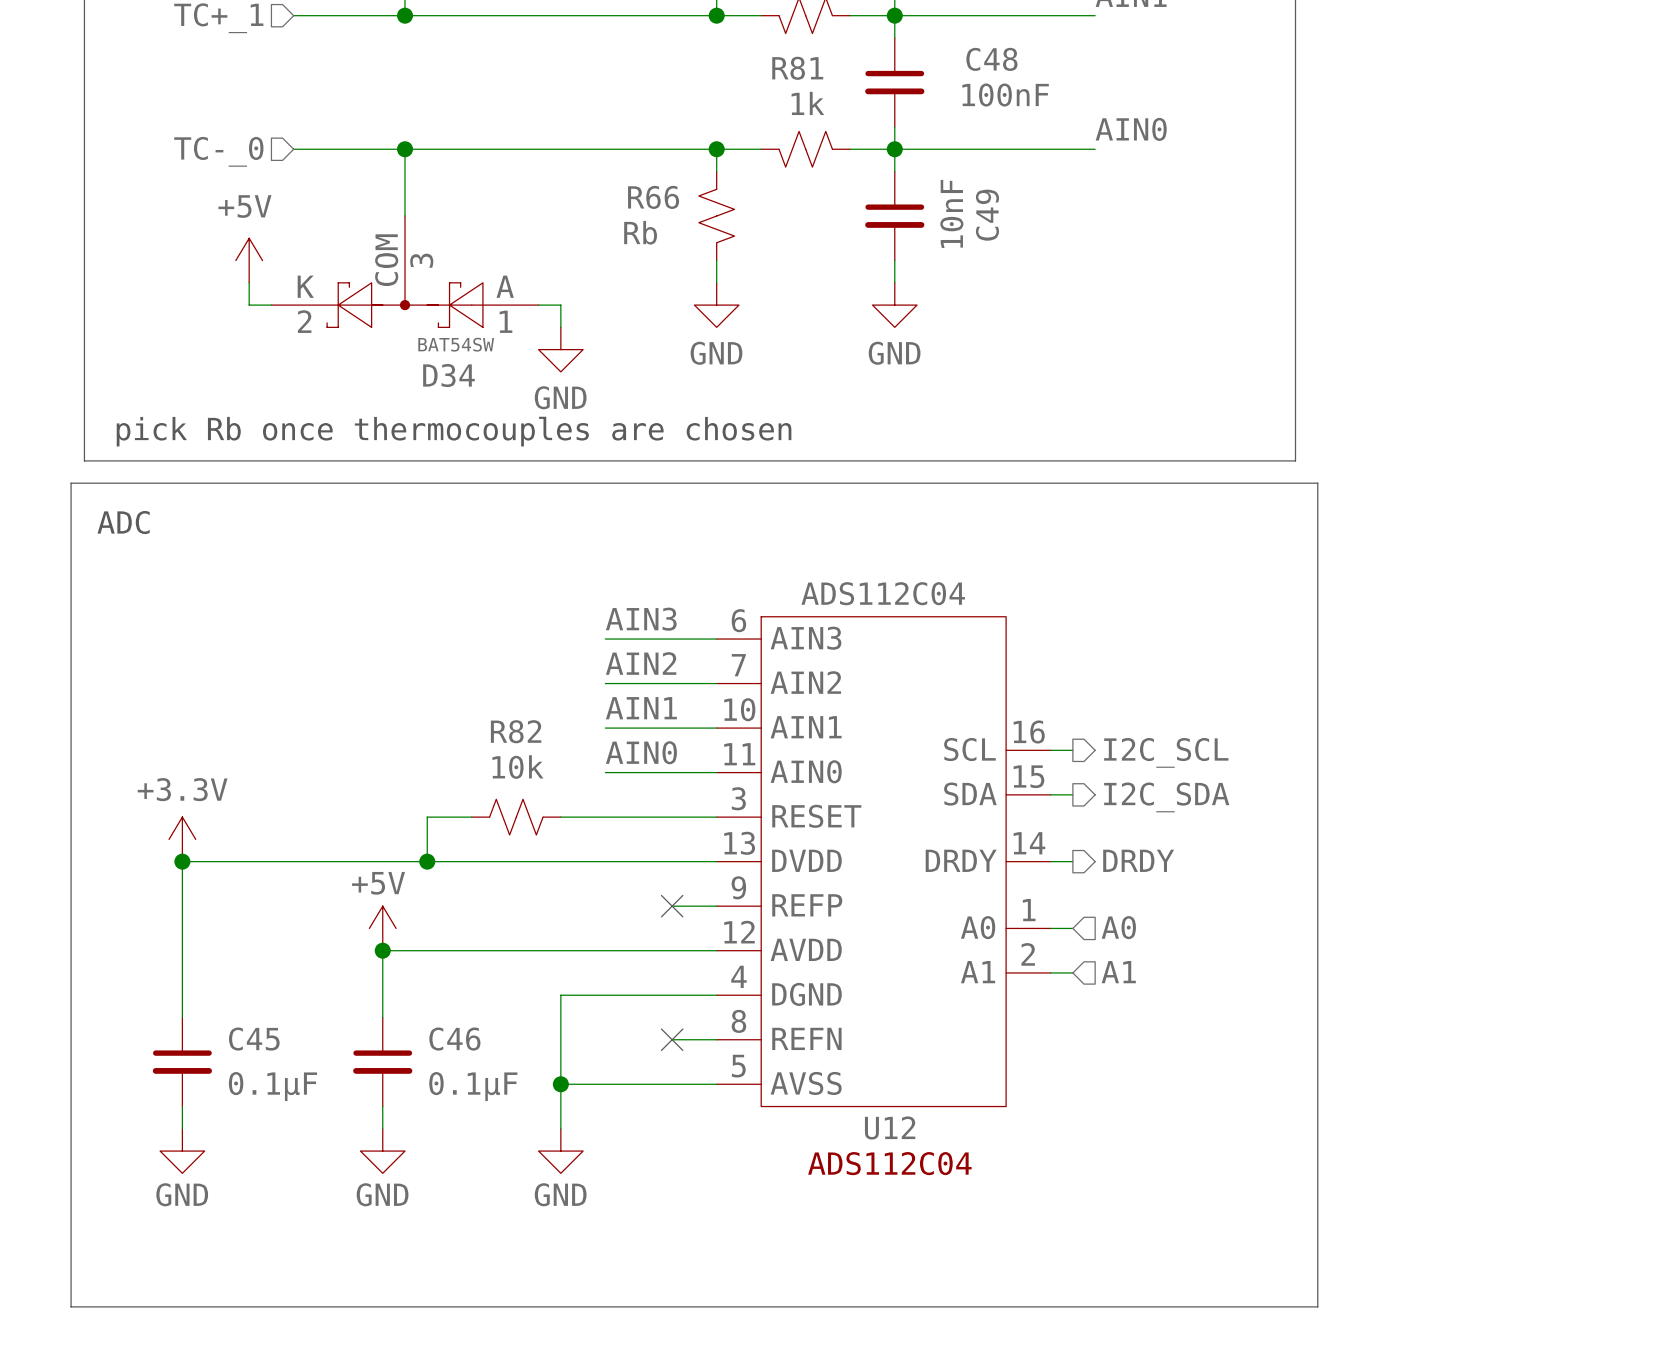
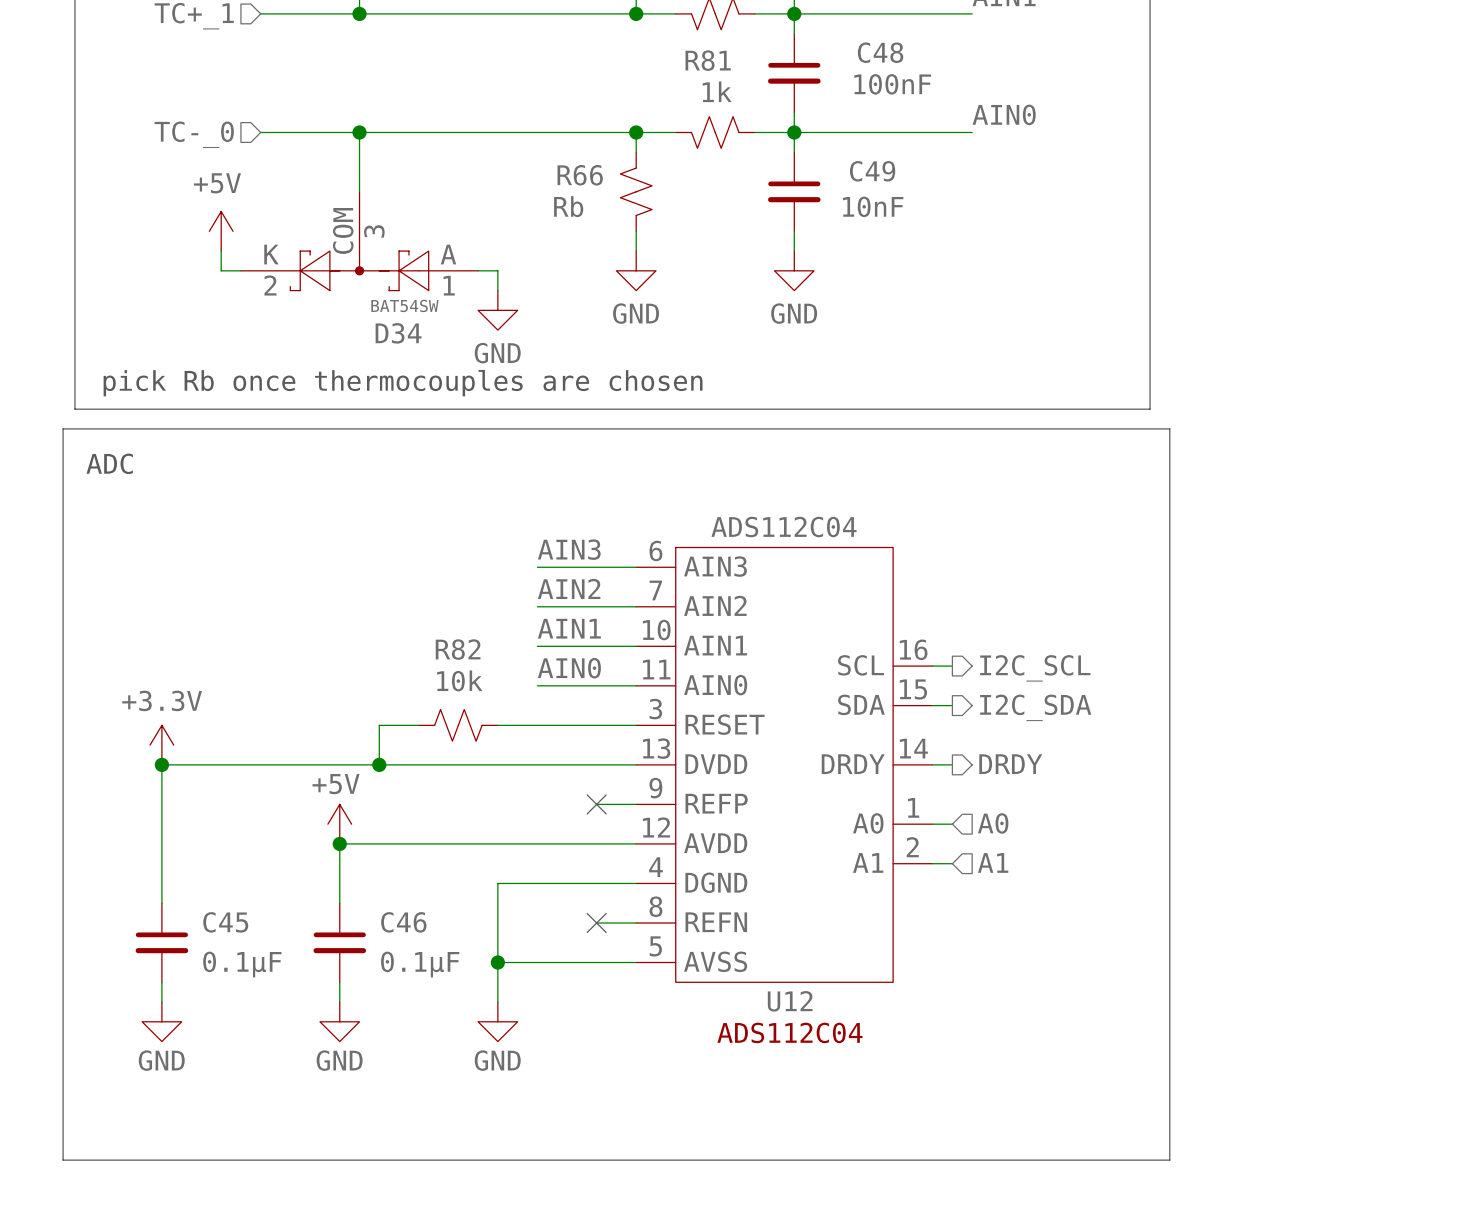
C49 value rotation: 0° (951, 213) -> 90° clockwise (873, 206)
C49 name rotation: 0° (987, 215) -> 90° clockwise (872, 171)

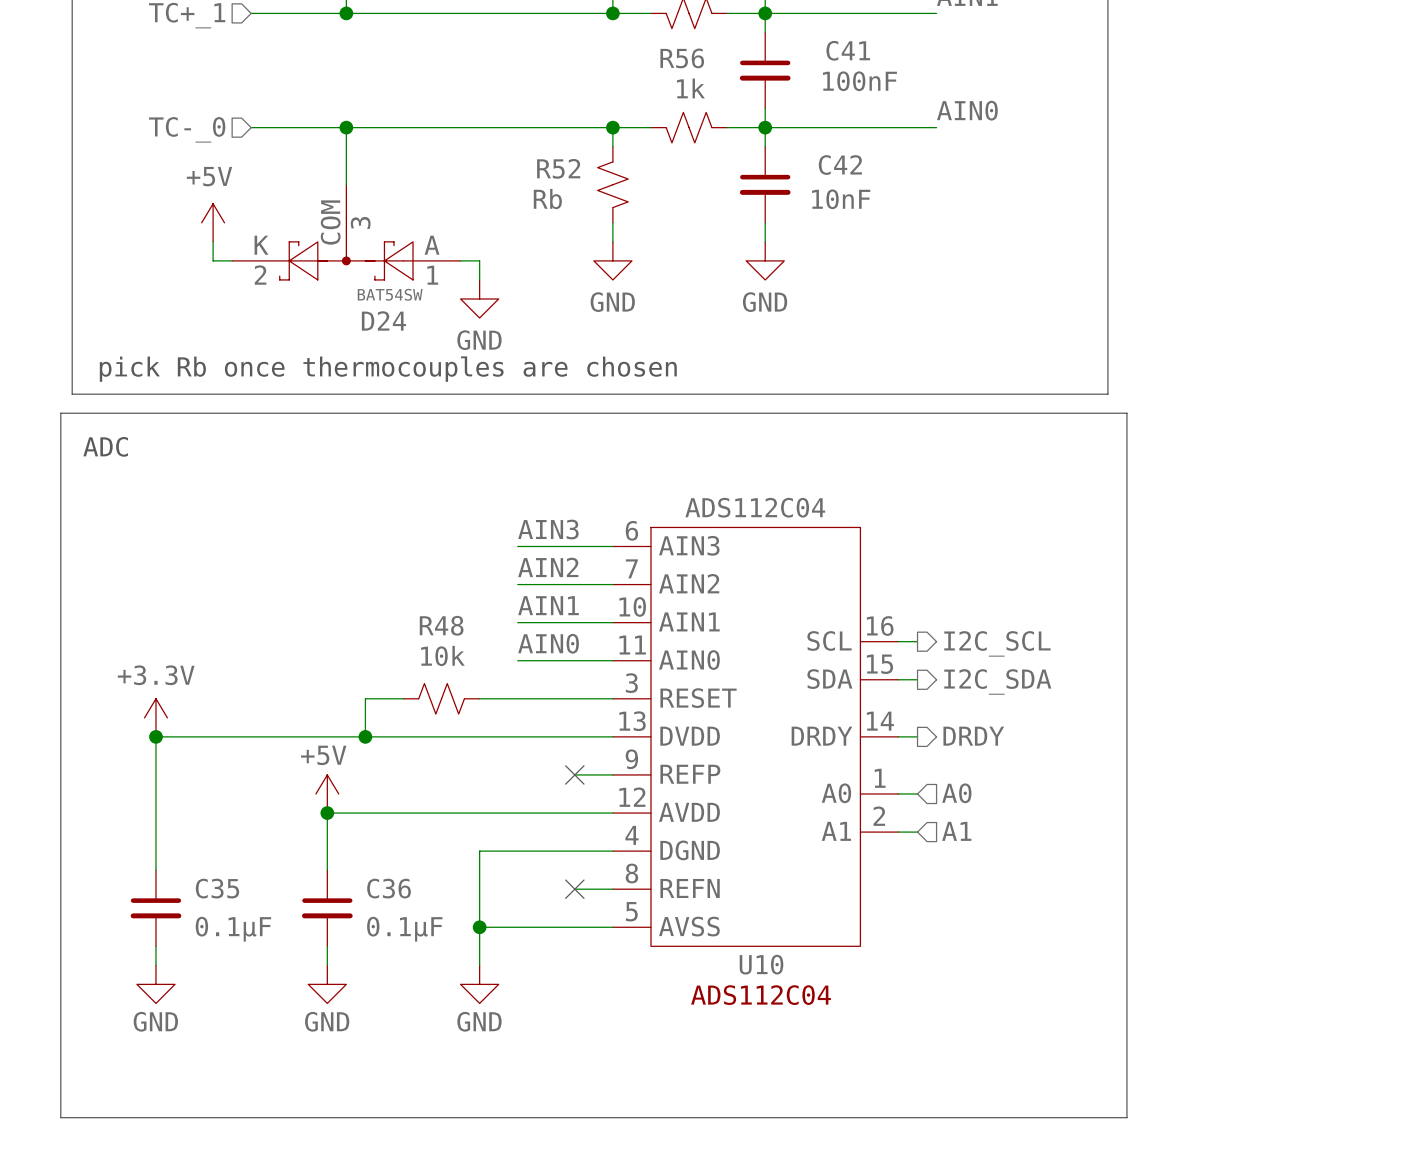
C48 name: C48 (880, 52) -> C41 (848, 50)
R81 name: R81 (708, 60) -> R56 (682, 58)
C49 name: C49 (872, 171) -> C42 (840, 165)
R66 name: R66 (580, 175) -> R52 (558, 168)
D34 name: D34 (398, 333) -> D24 (383, 320)
R82 name: R82 (458, 649) -> R48 (441, 625)
C45 name: C45 (225, 922) -> C35 (217, 888)
C46 name: C46 (403, 922) -> C36 (389, 888)
U12 name: U12 (790, 1001) -> U10 (761, 964)

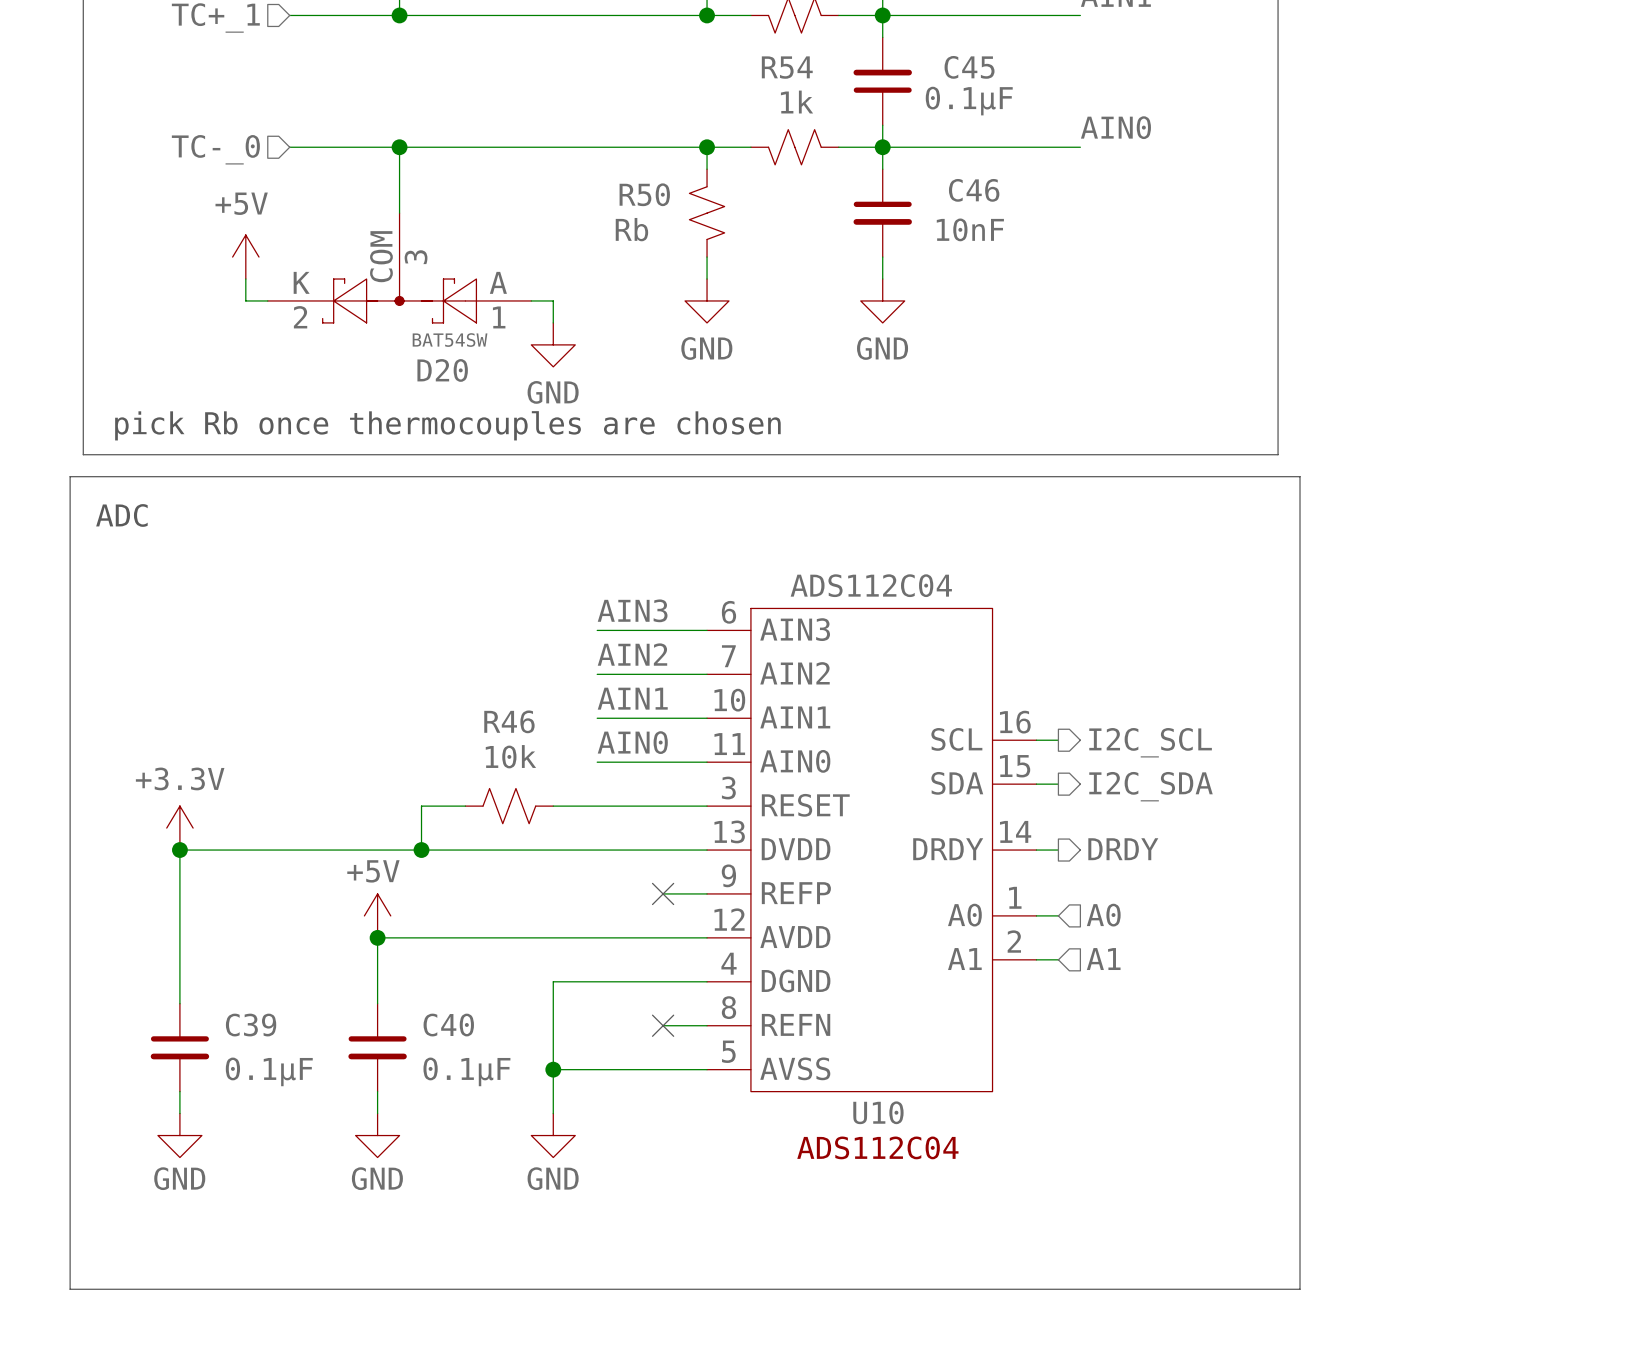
R56 name: R56 (682, 58) -> R54 (787, 67)
C41: 100nF (765, 70) -> none
C45: none -> 0.1μF (882, 81)
C42 name: C42 (840, 165) -> C46 (974, 190)
R52 name: R52 (558, 168) -> R50 (644, 194)
D24 name: D24 (383, 320) -> D20 (442, 370)
R48 name: R48 (441, 625) -> R46 (509, 721)
C35 name: C35 (217, 888) -> C39 (251, 1025)
C36 name: C36 (389, 888) -> C40 (448, 1025)

